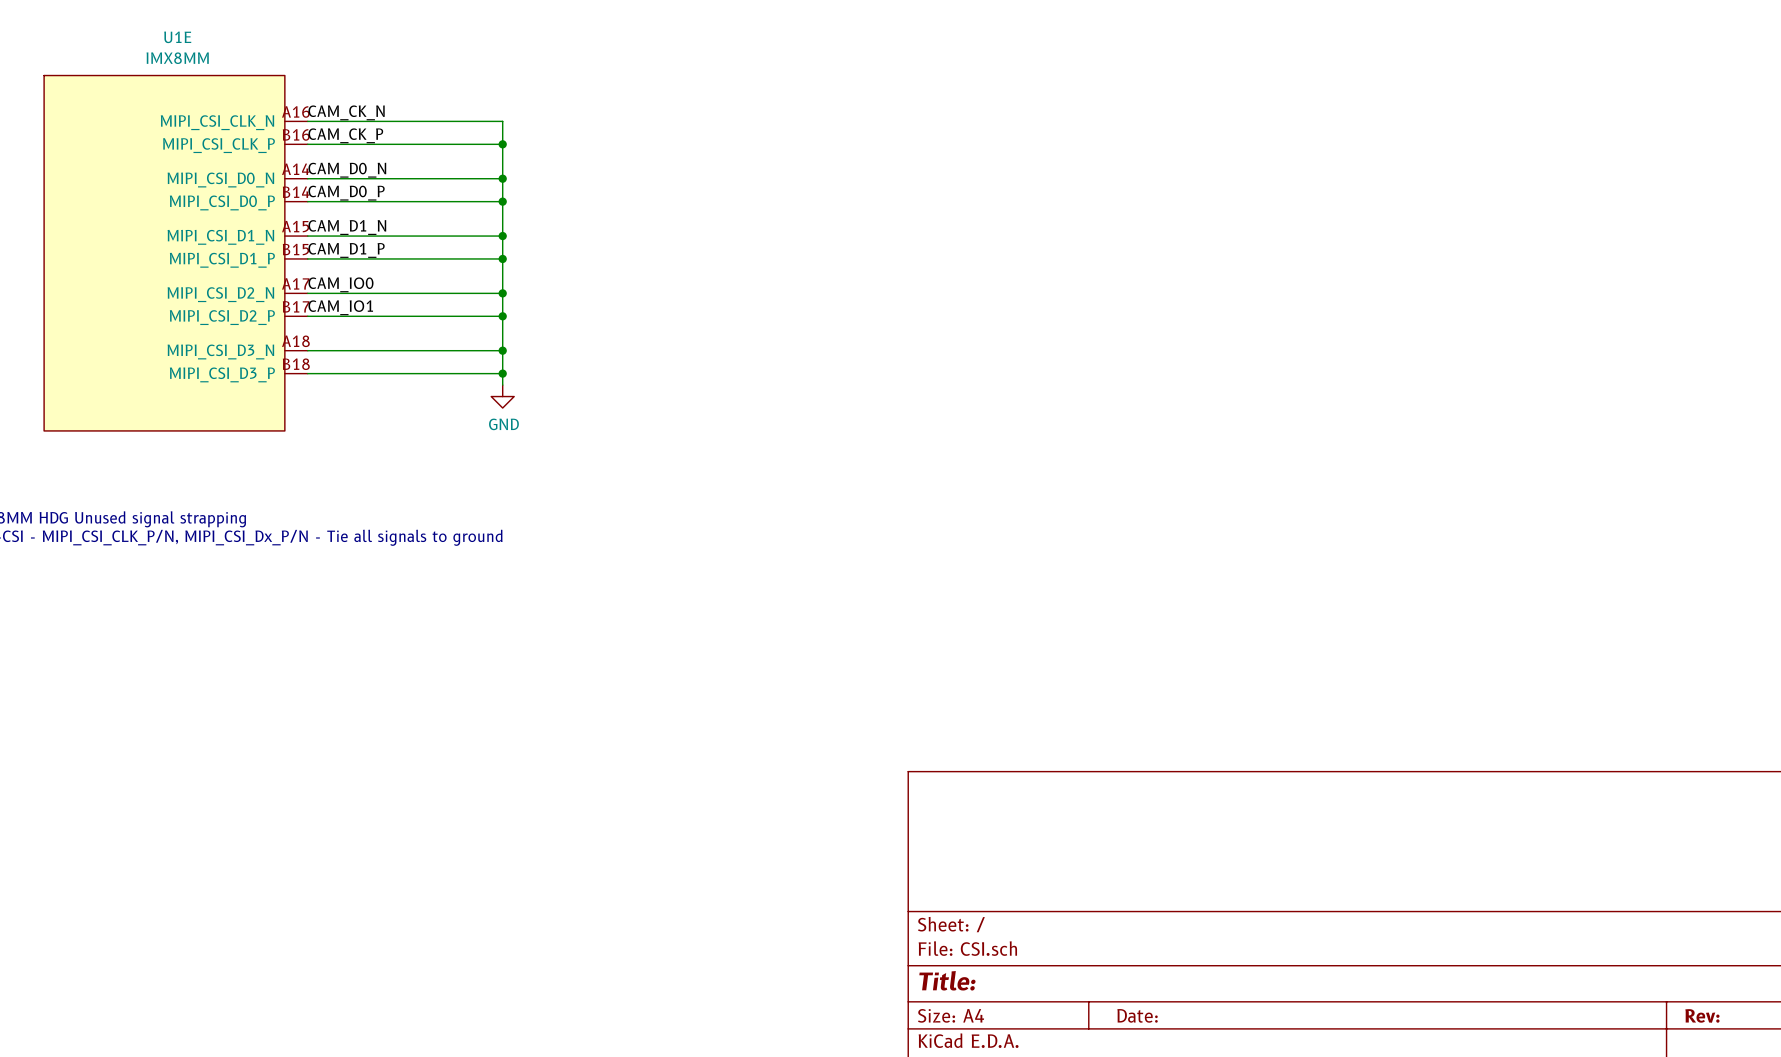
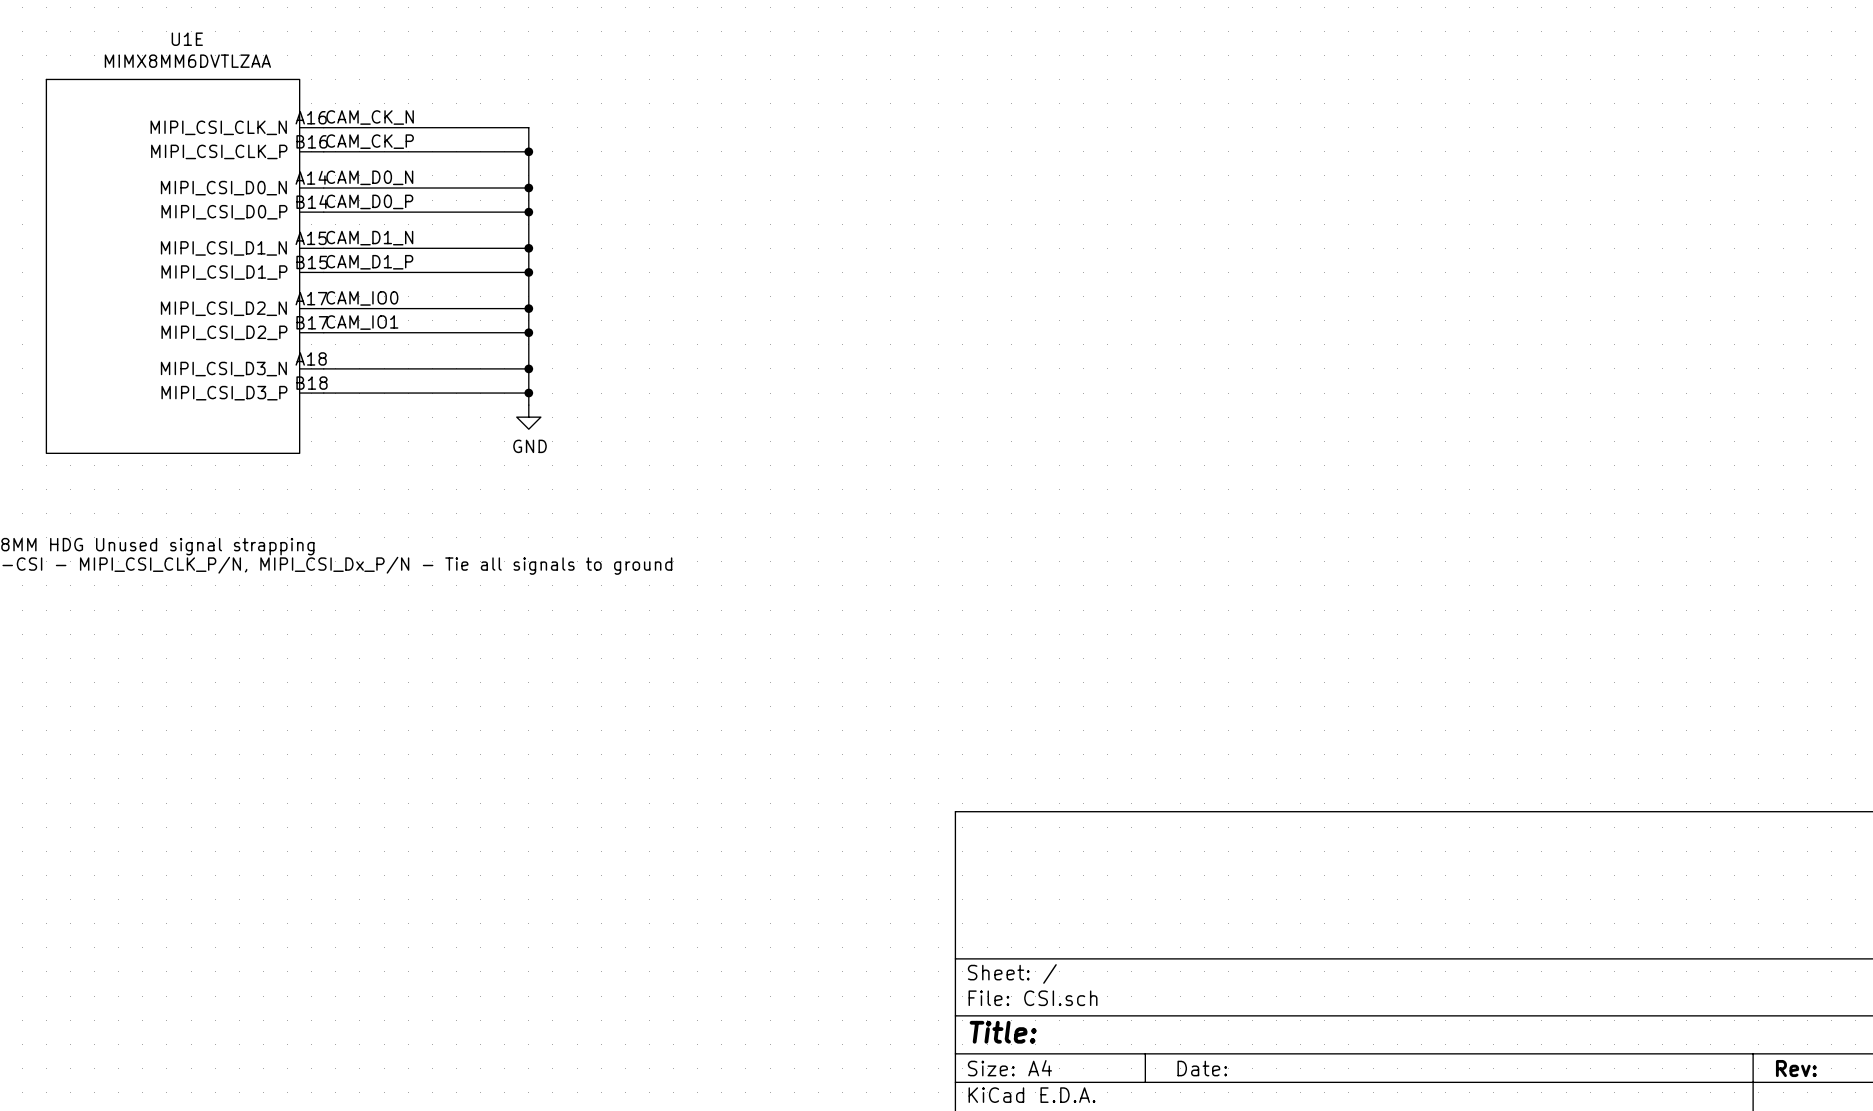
U1E value: IMX8MM (177, 58) -> MIMX8MM6DVTLZAA (187, 61)

